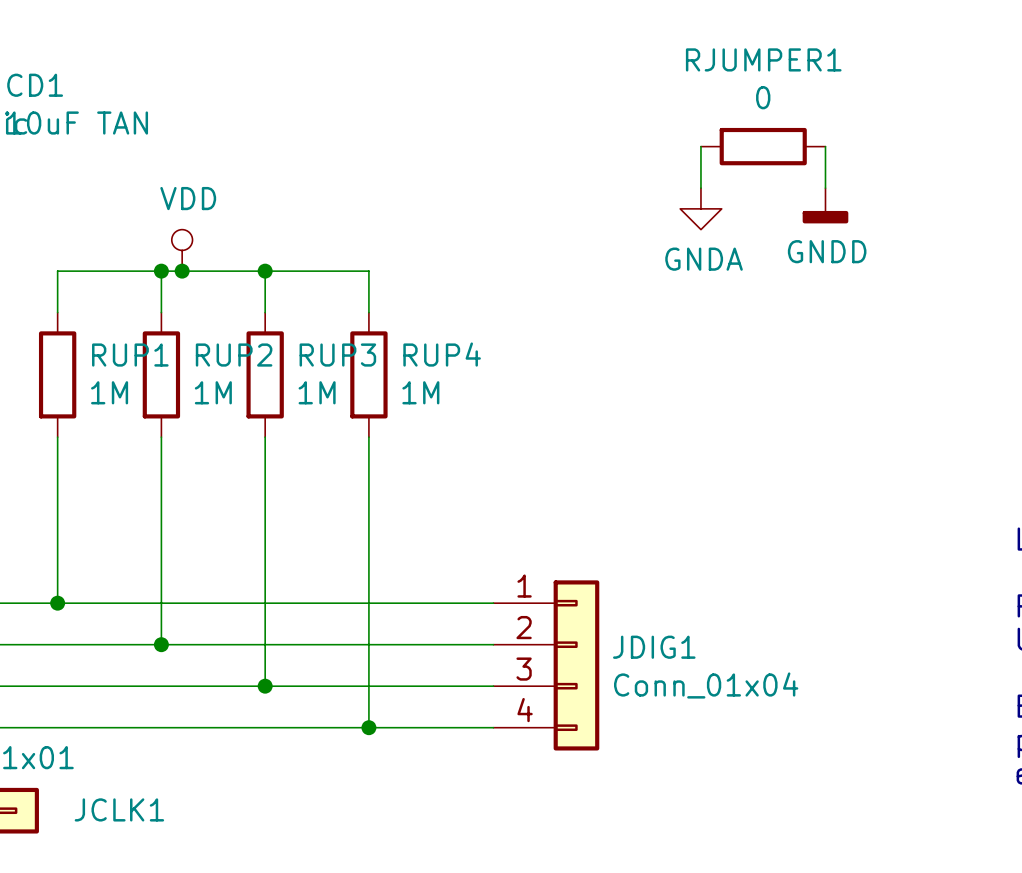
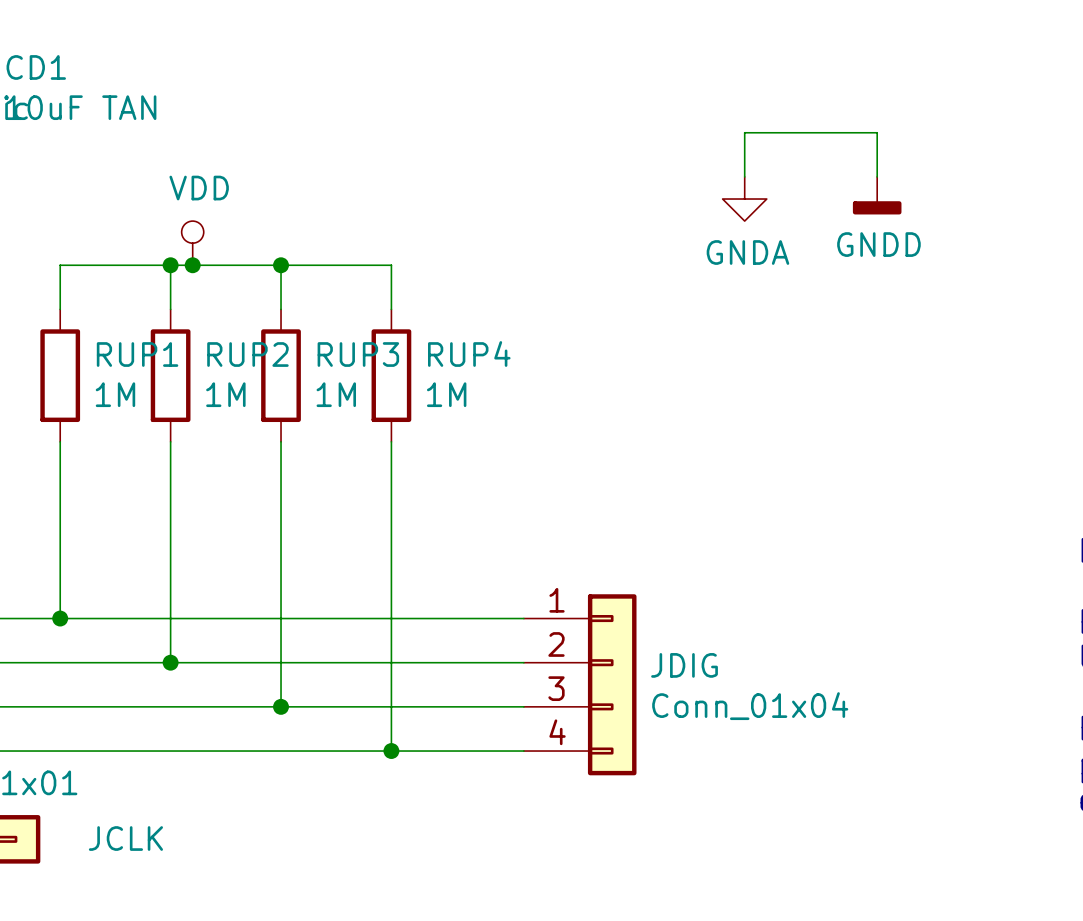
wire: none -> (744, 132) (877, 132)
RJUMPER1: 0 (763, 146) -> none
JDIG1 name: JDIG1 (654, 647) -> JDIG (684, 665)
JCLK1 name: JCLK1 (119, 809) -> JCLK (125, 838)

